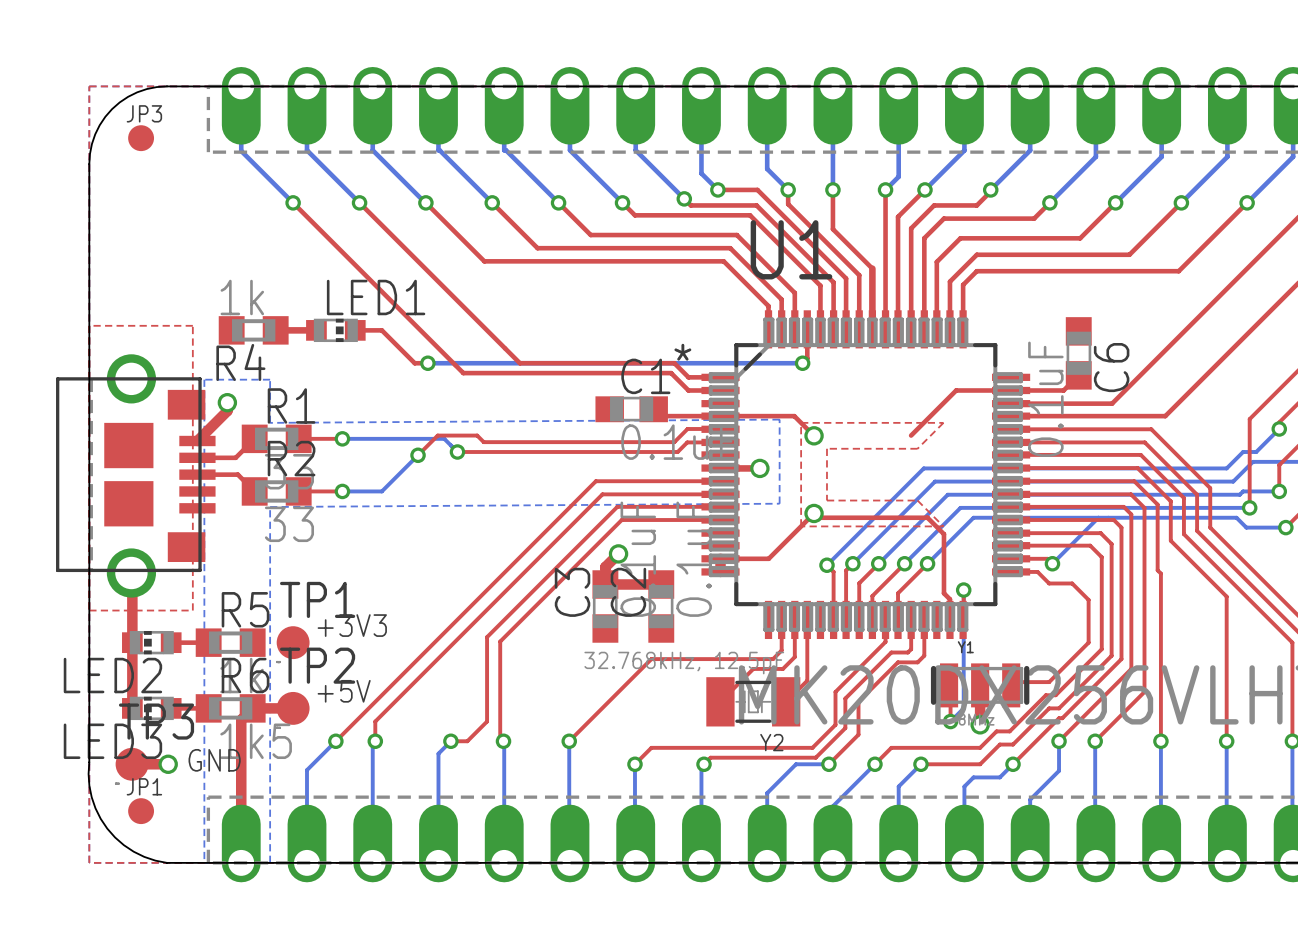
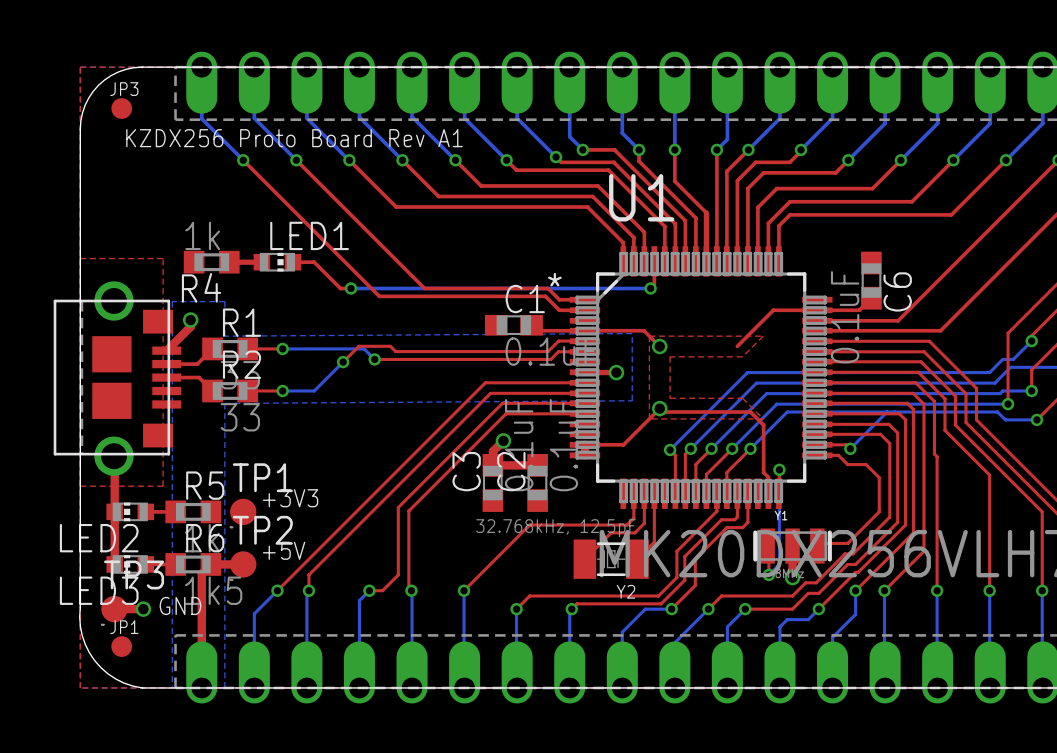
text: none -> KZDX256 Proto Board Rev A1 (294, 138)

